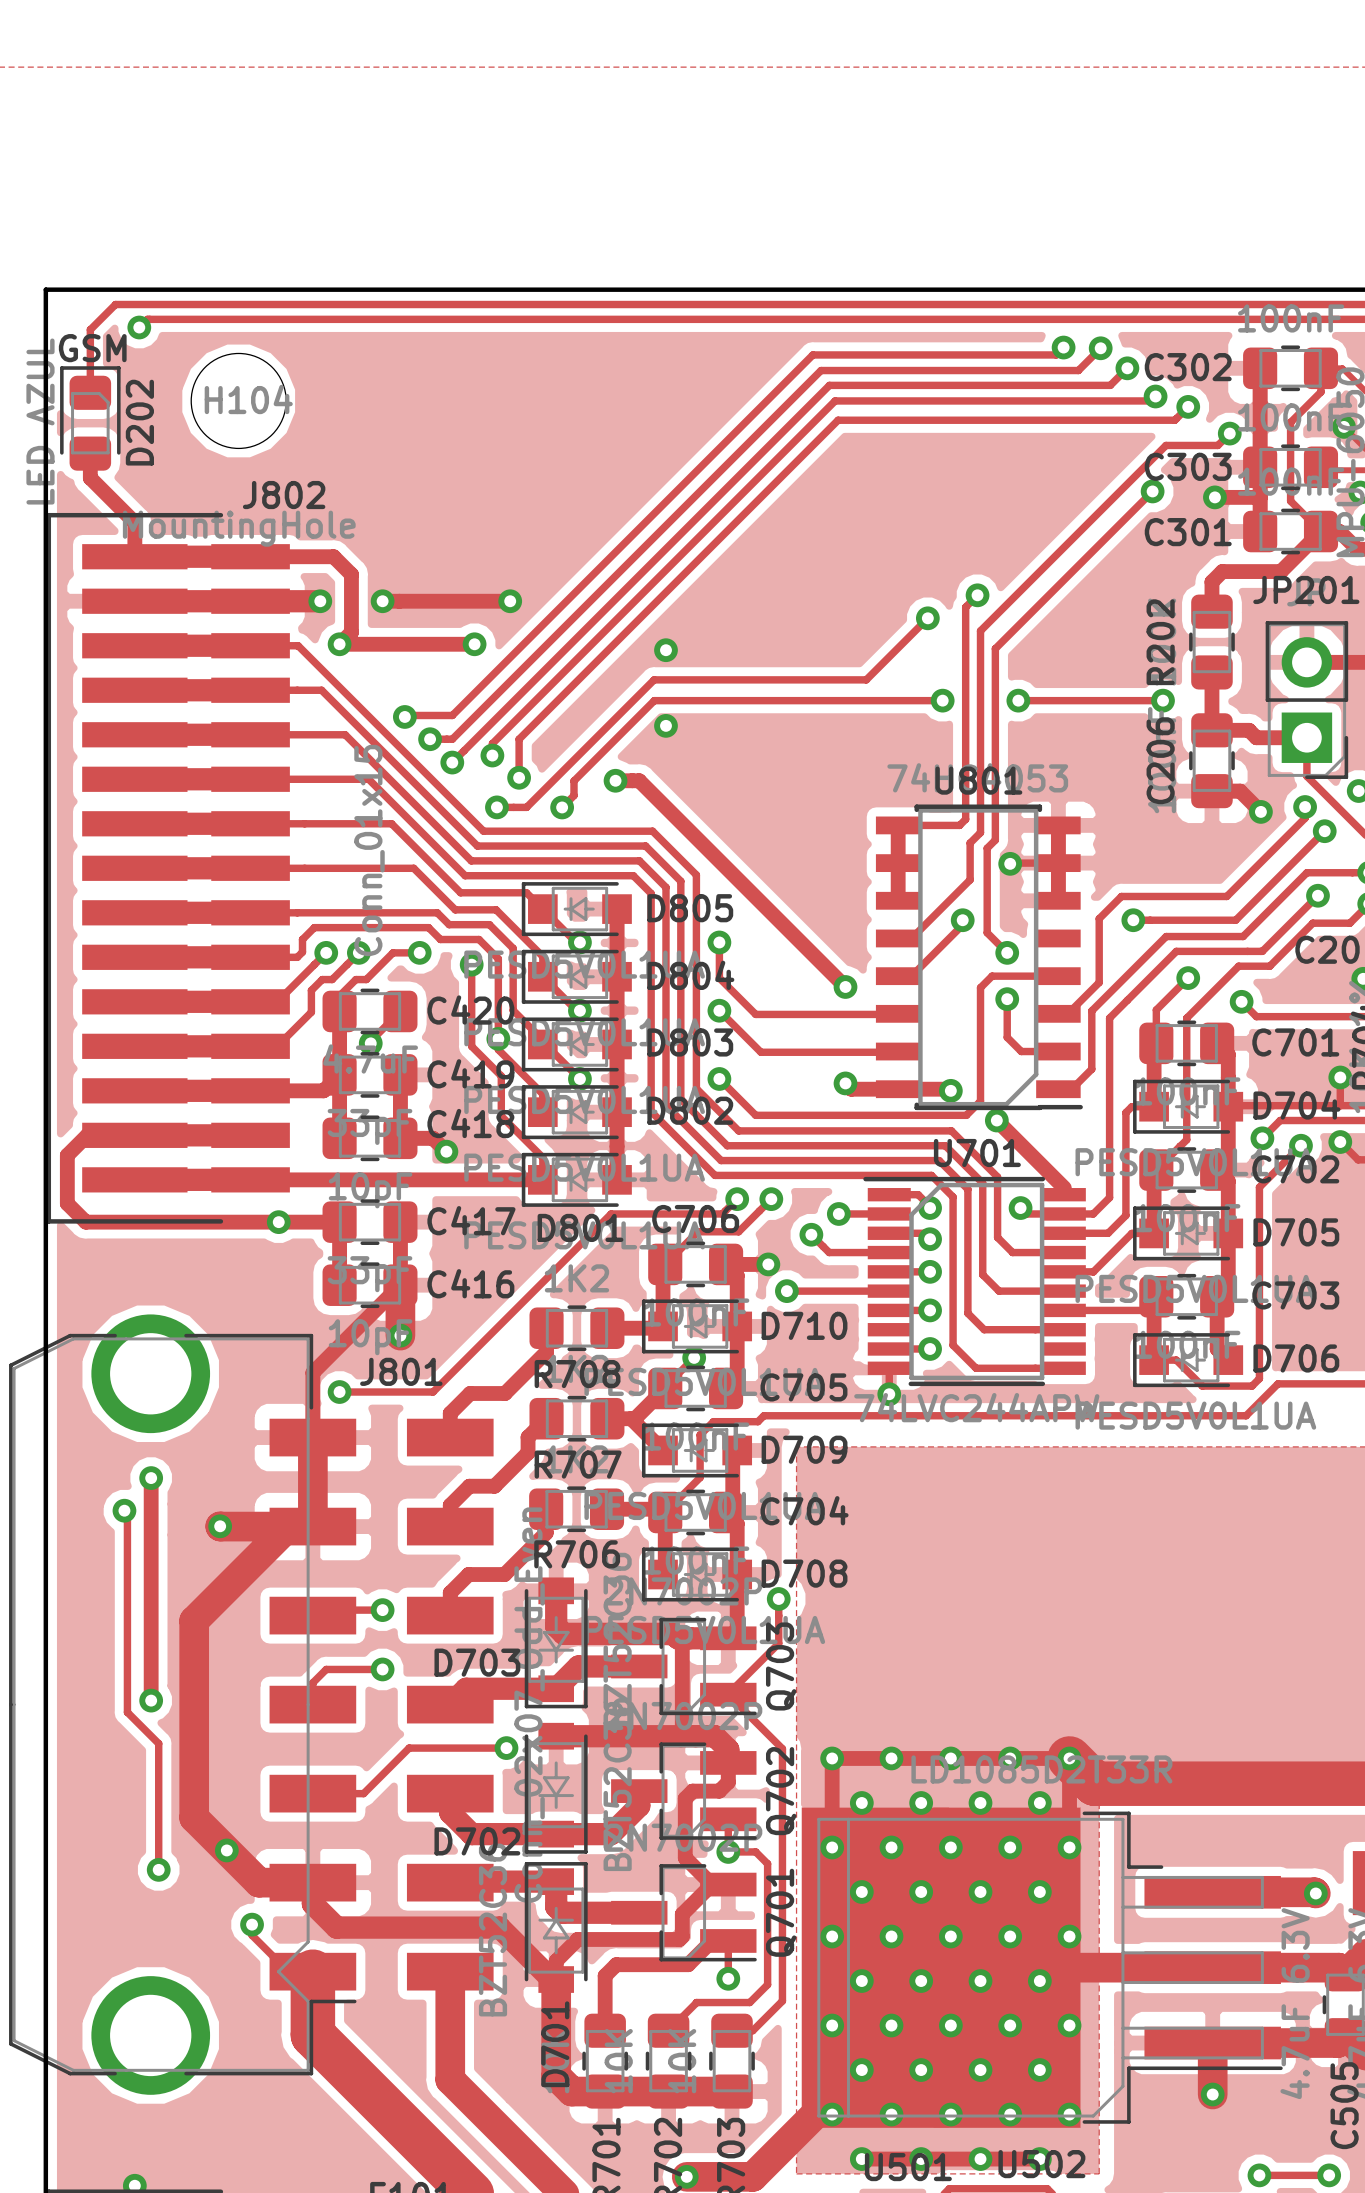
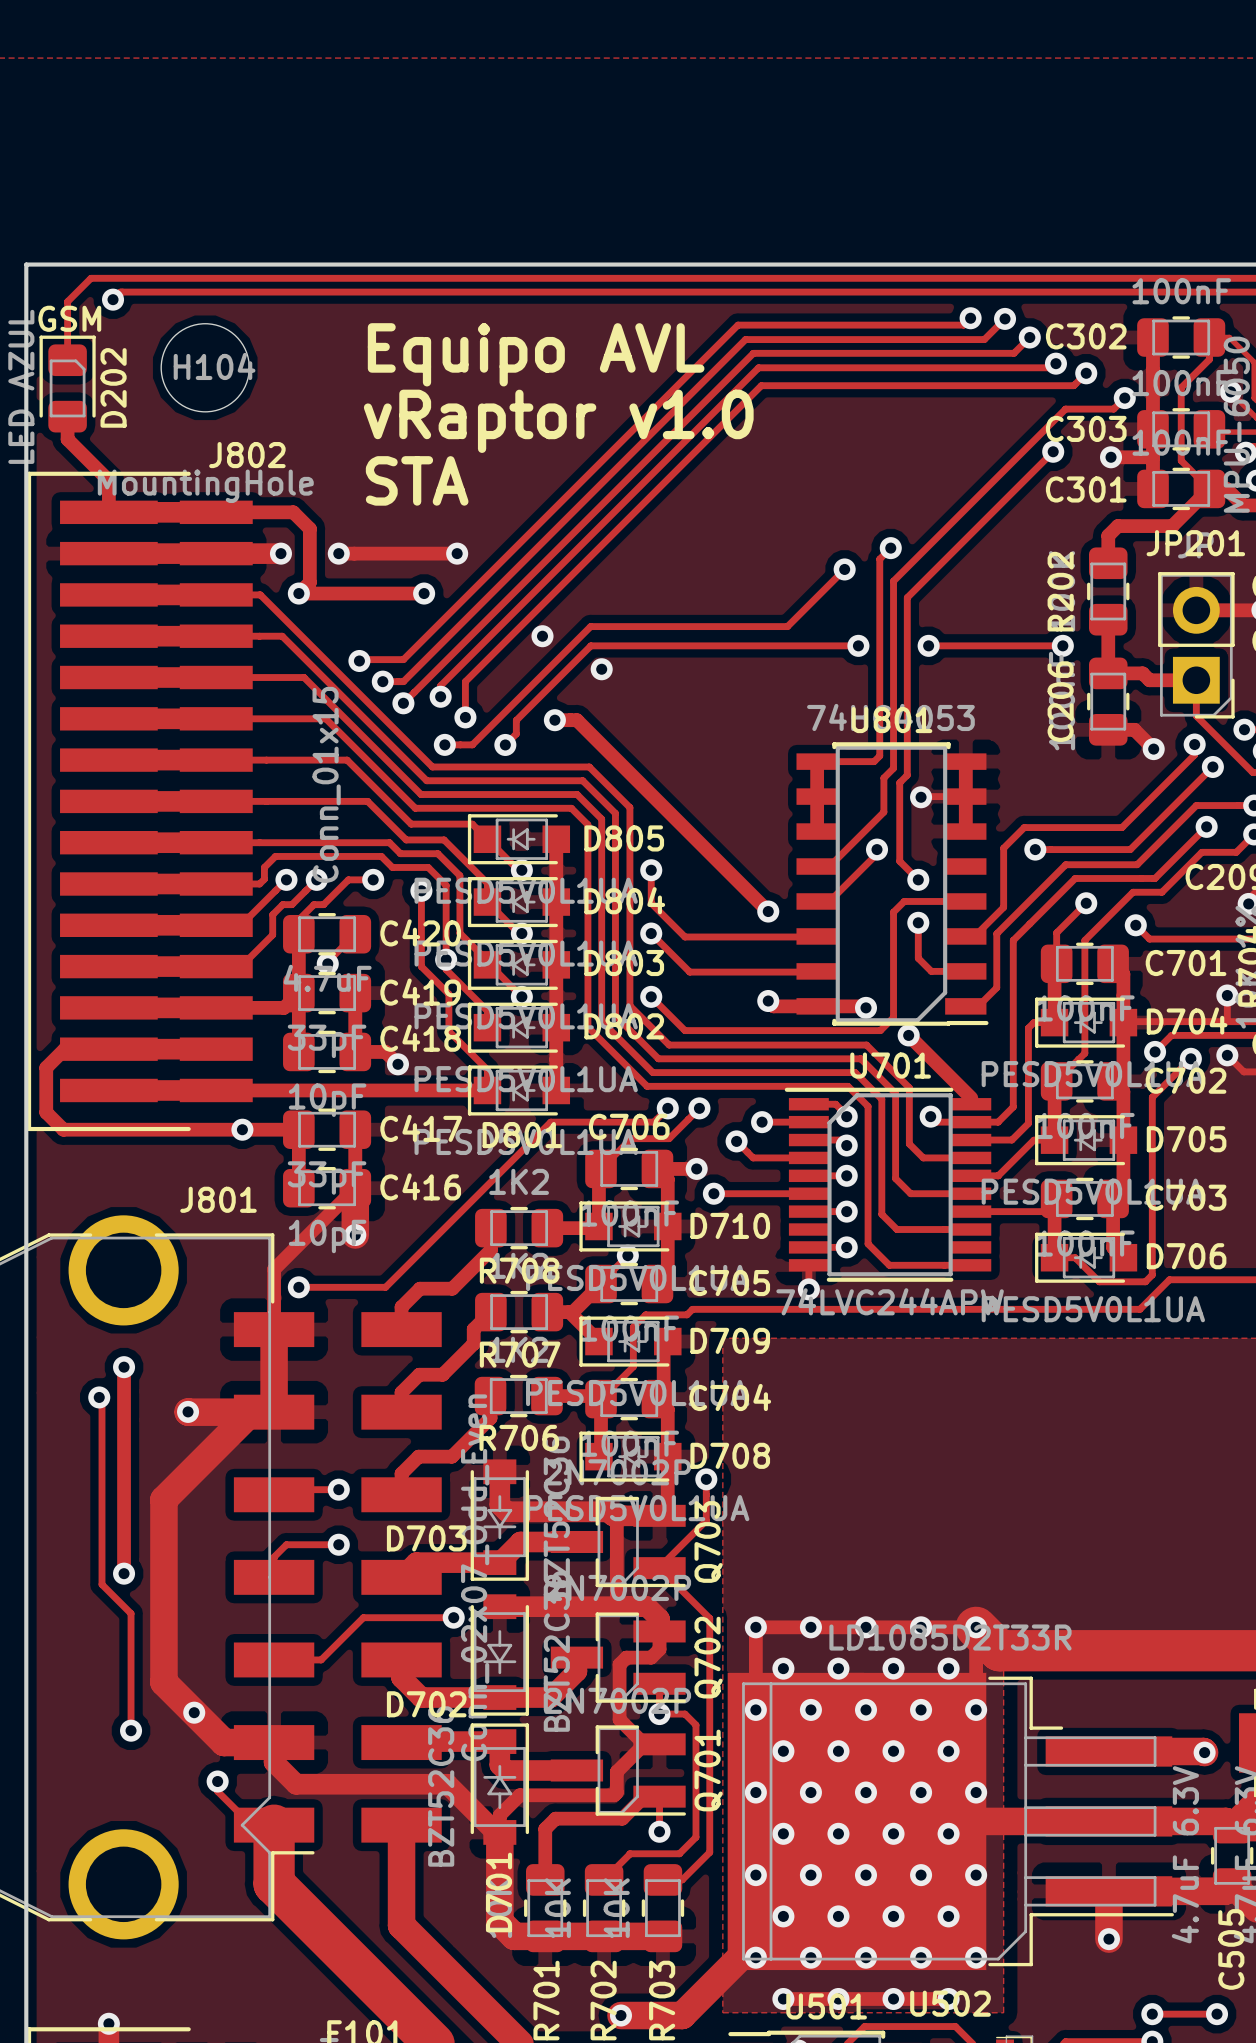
text: none -> Equipo AVL (536, 354)
text: none -> vRaptor v1.0 (558, 421)
text: none -> STA (417, 480)
via position: (665, 650) -> (542, 636)
J801 name position: J801 (401, 1371) -> J801 (218, 1199)

